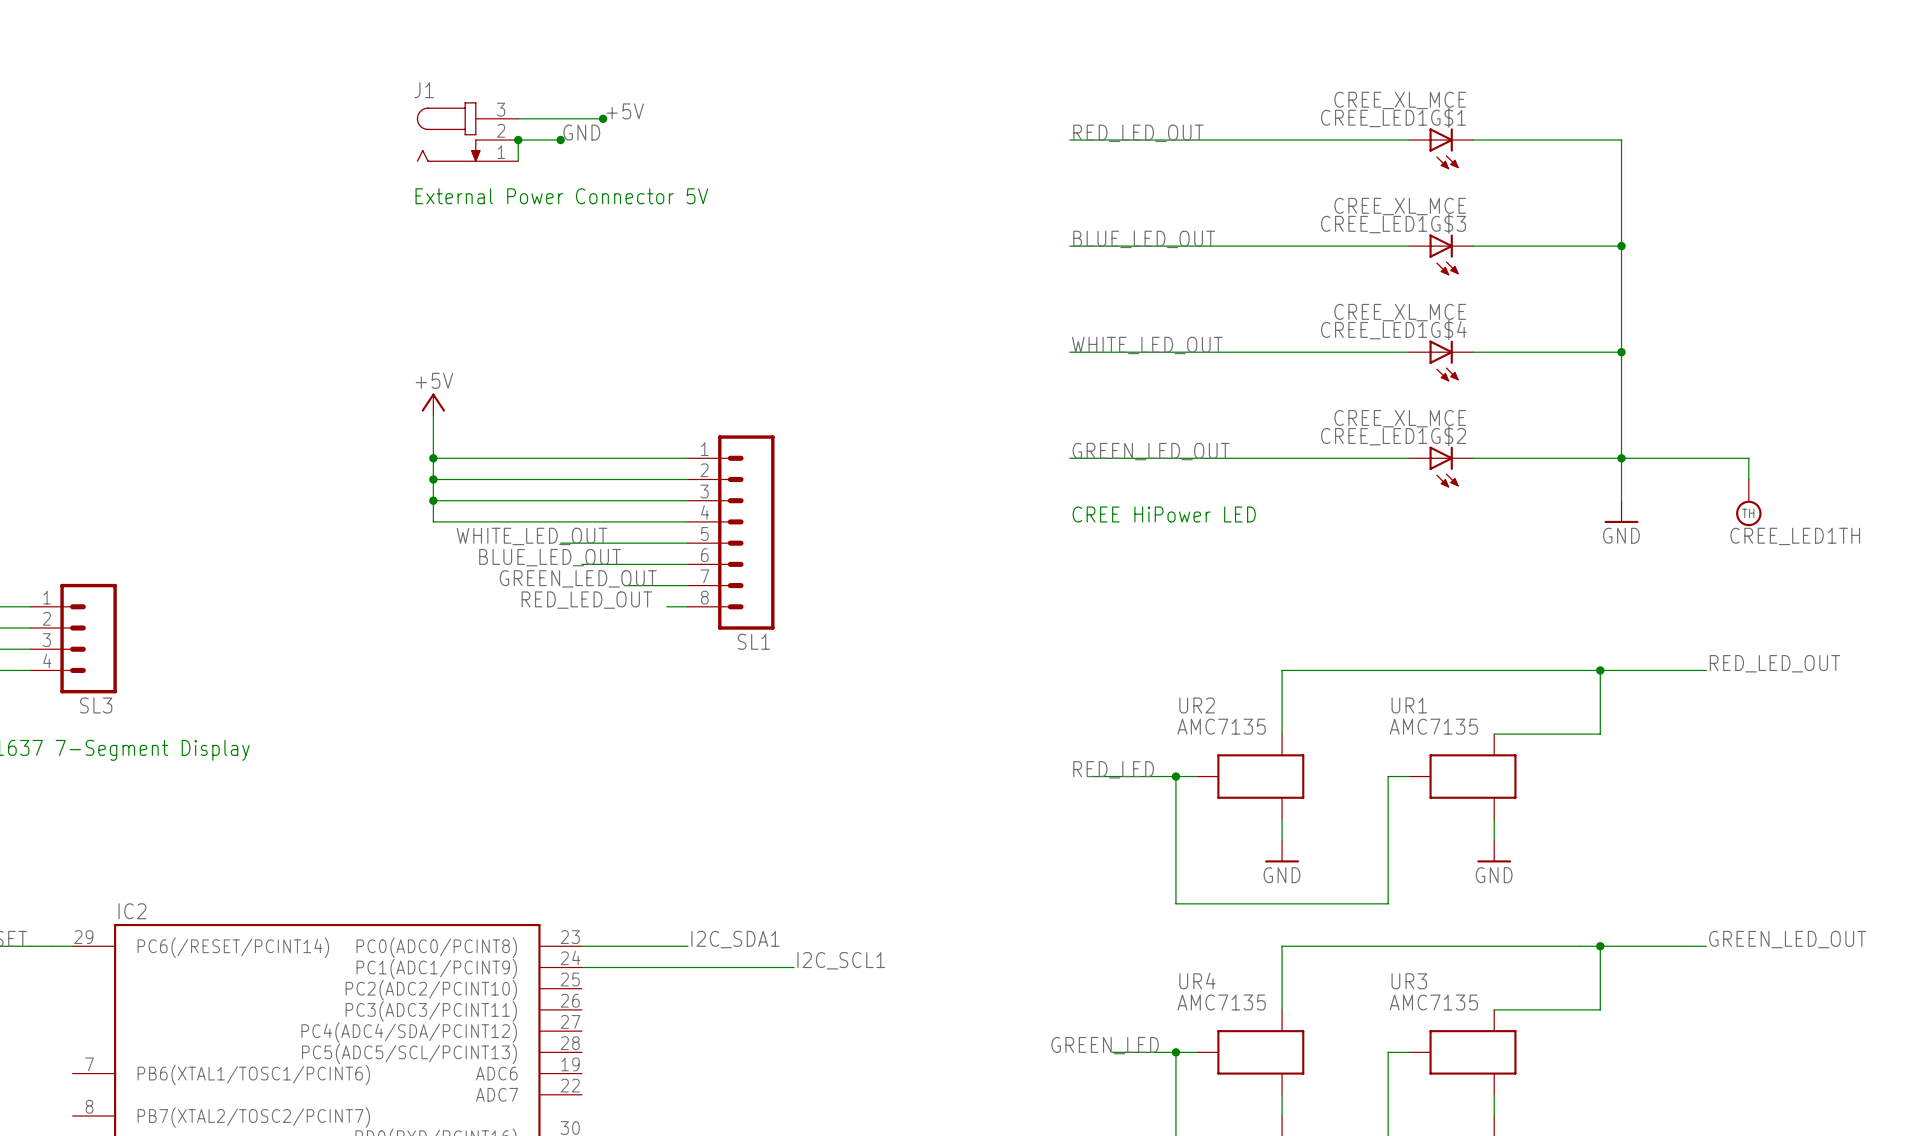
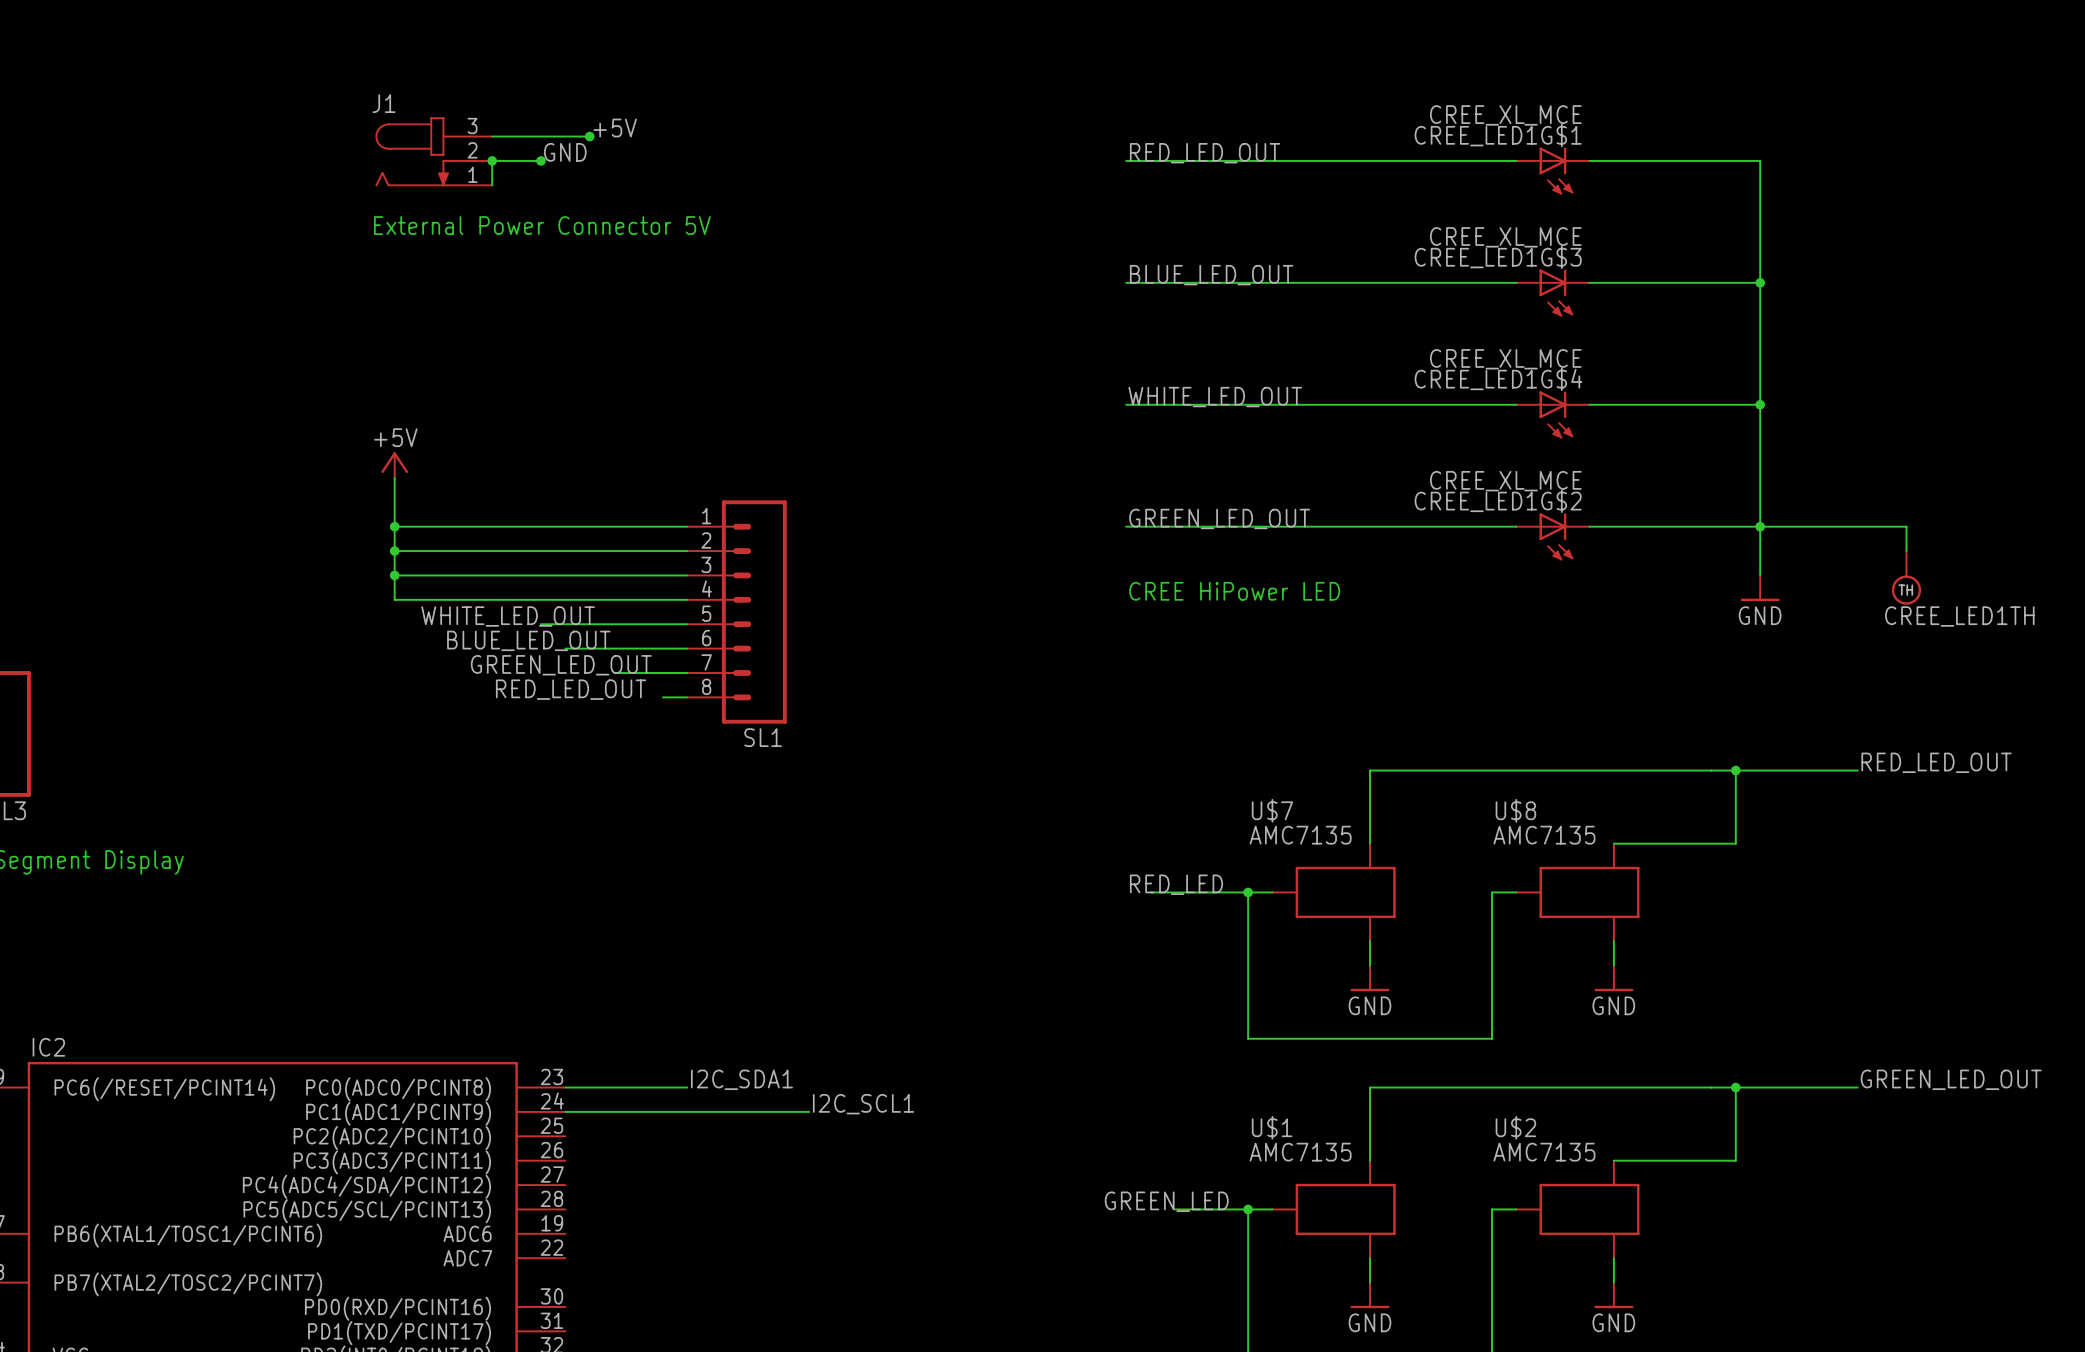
UR2 name: UR2 (1197, 705) -> U$7 (1272, 810)
UR1 name: UR1 (1409, 705) -> U$8 (1515, 810)
UR4 name: UR4 (1197, 980) -> U$1 (1272, 1127)
UR3 name: UR3 (1409, 981) -> U$2 (1515, 1127)

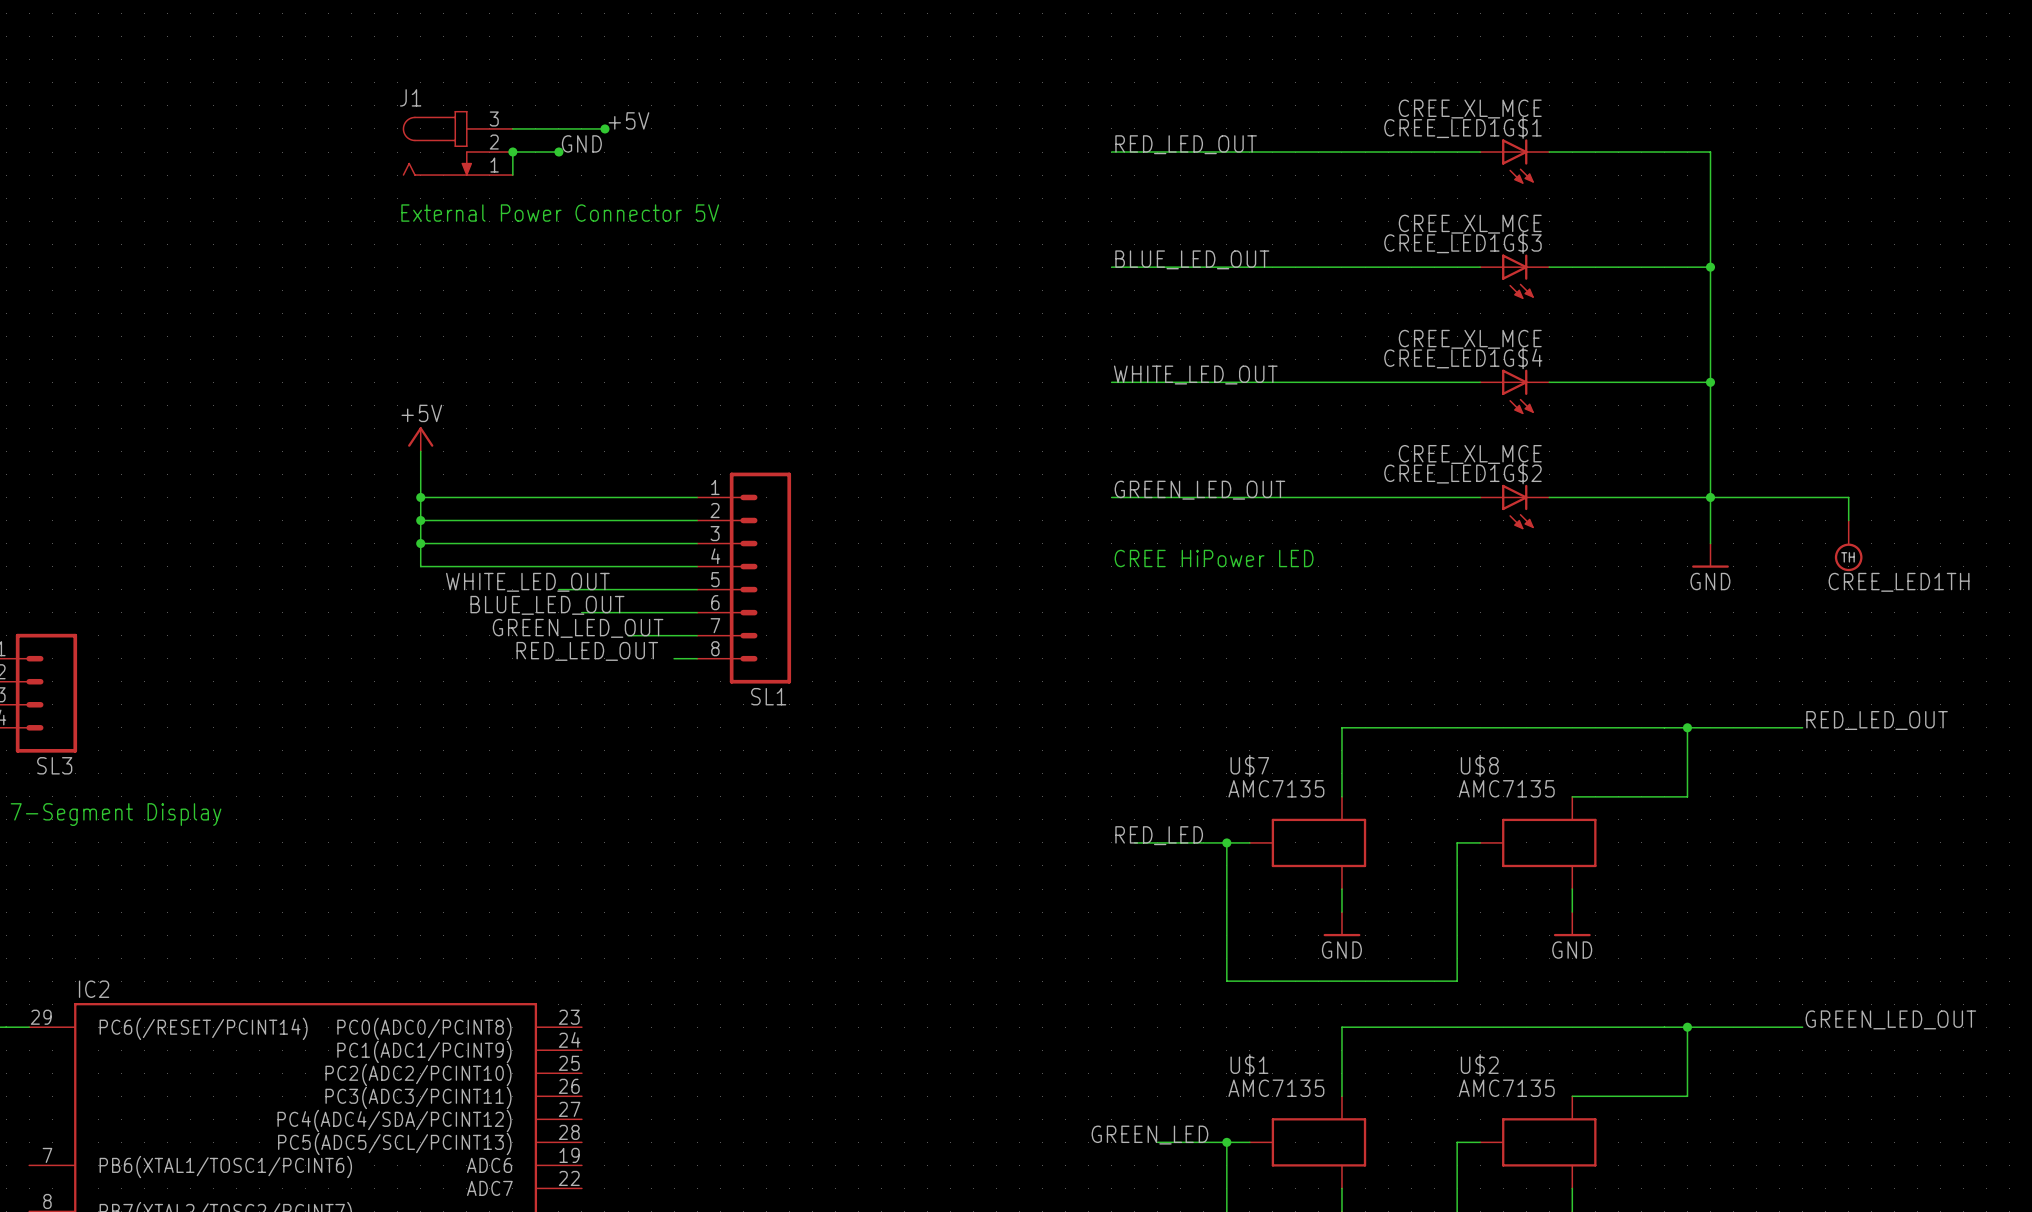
label: I2C_SDA1 (741, 1079) -> none
wire: (565, 1087) (687, 1087) -> none
label: I2C_SCL1 (863, 1104) -> none
wire: (565, 1111) (809, 1111) -> none

